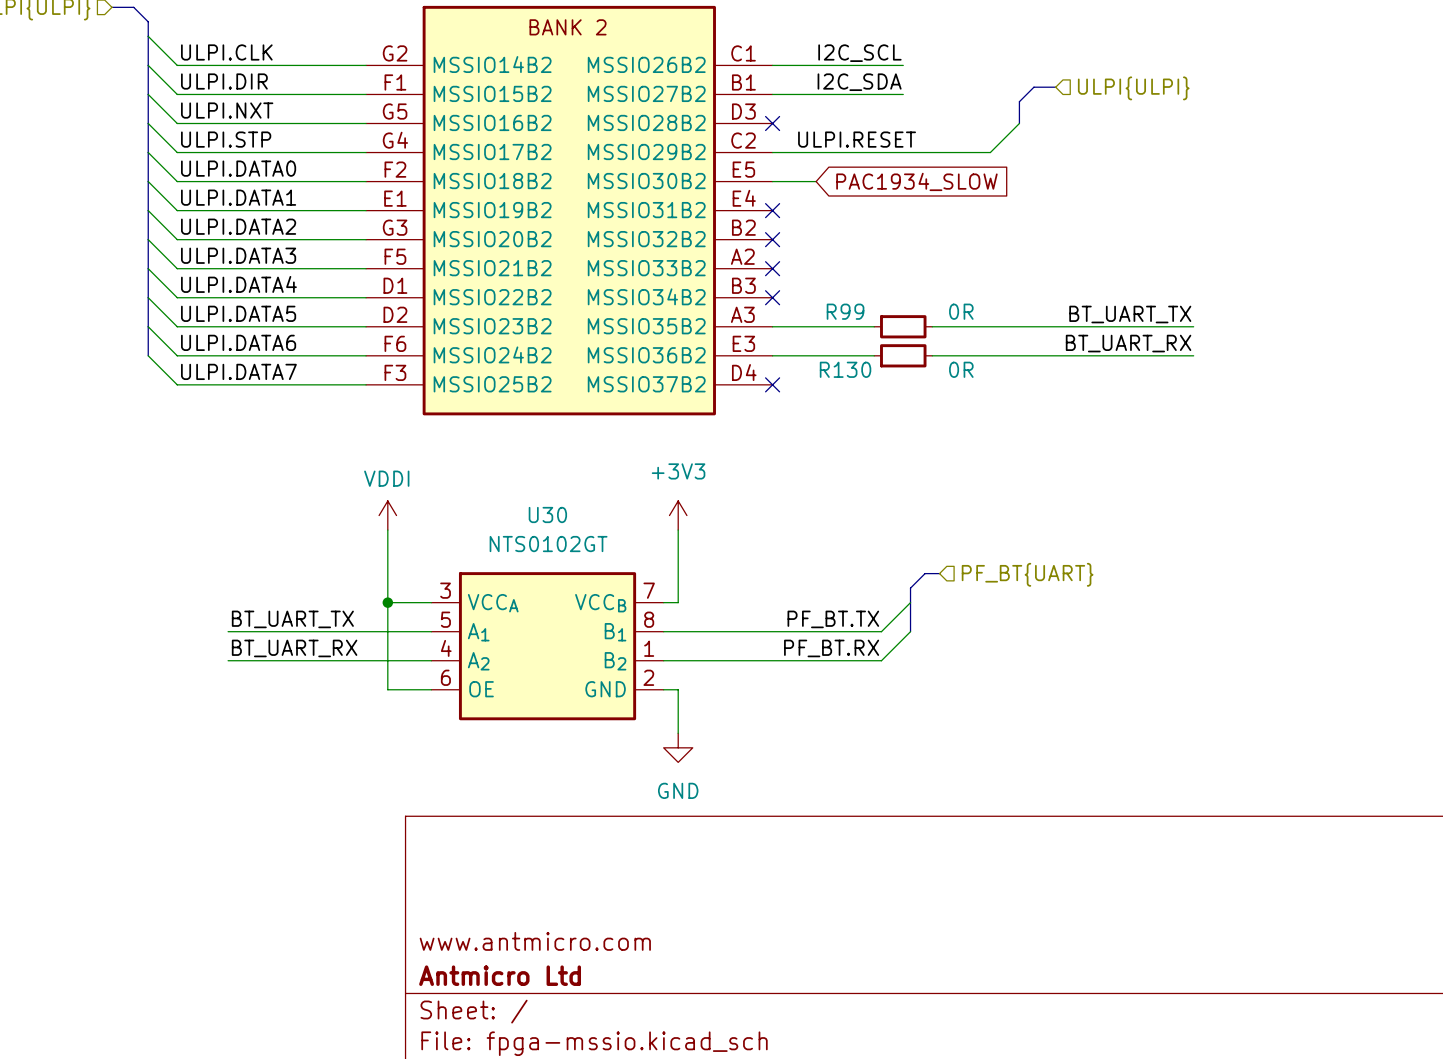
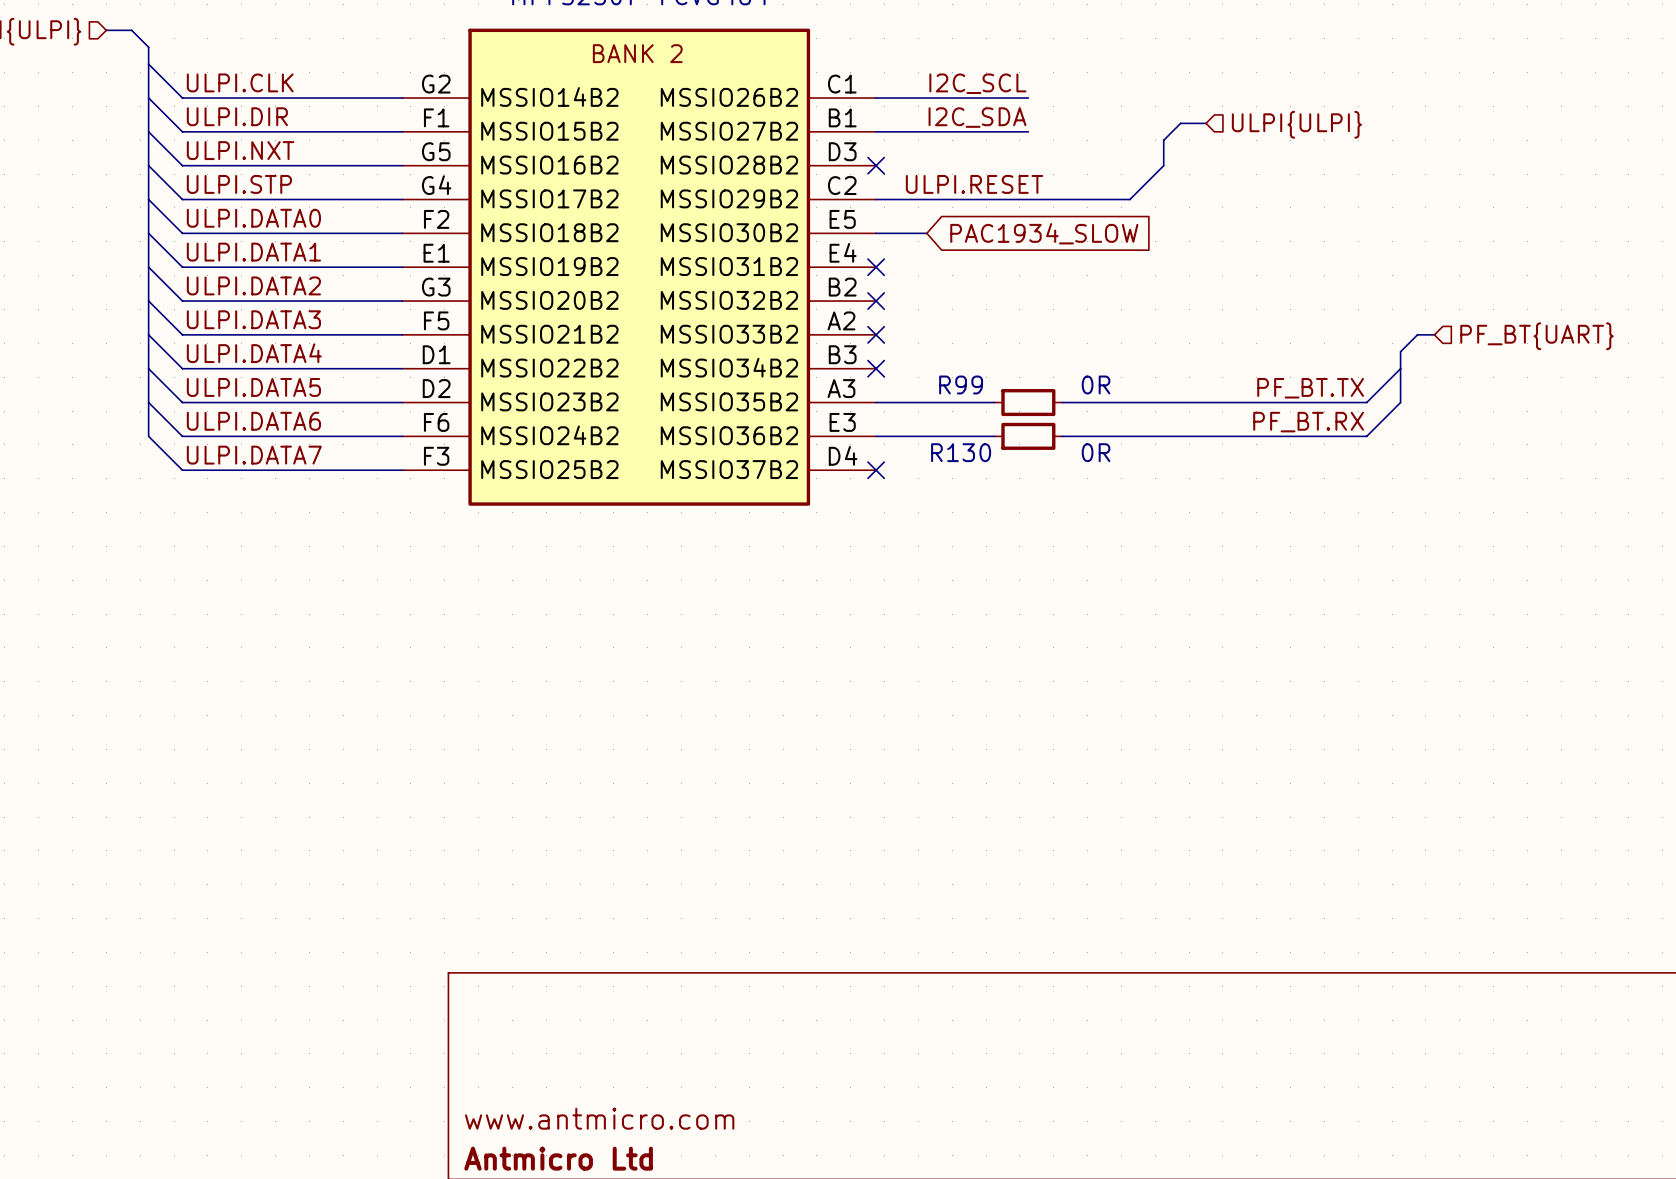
bus: none -> (1434, 334) (1417, 334) (1400, 351) (1400, 402)
hierarchical label: none -> PF_BT{UART} (1536, 336)
wire: none -> (1400, 368) (1366, 402)
label: BT_UART_TX (1130, 314) -> PF_BT.TX (1310, 388)
wire: none -> (1400, 402) (1366, 436)
label: BT_UART_RX (1128, 343) -> PF_BT.RX (1308, 422)
power symbol: VDDI (387, 515) -> none
power symbol: +3V3 (678, 515) -> none
wire: (387, 530) (387, 689) (431, 689) -> none
wire: (678, 530) (678, 602) (663, 602) -> none
bus: (939, 573) (925, 573) (910, 588) (910, 631) -> none
hierarchical label: PF_BT{UART} (1027, 574) -> none
wire: (387, 602) (431, 602) -> none
junction: (387, 602) -> none
wire: (910, 602) (881, 631) (663, 631) -> none
label: BT_UART_TX (292, 619) -> none
label: PF_BT.TX (833, 619) -> none
wire: (228, 631) (431, 631) -> none
wire: (910, 631) (881, 660) (663, 660) -> none
U30: (547, 646) -> none
label: BT_UART_RX (294, 648) -> none
label: PF_BT.RX (831, 648) -> none
wire: (228, 660) (431, 660) -> none
wire: (663, 689) (678, 689) (678, 733) -> none
power symbol: GND (678, 747) -> none

